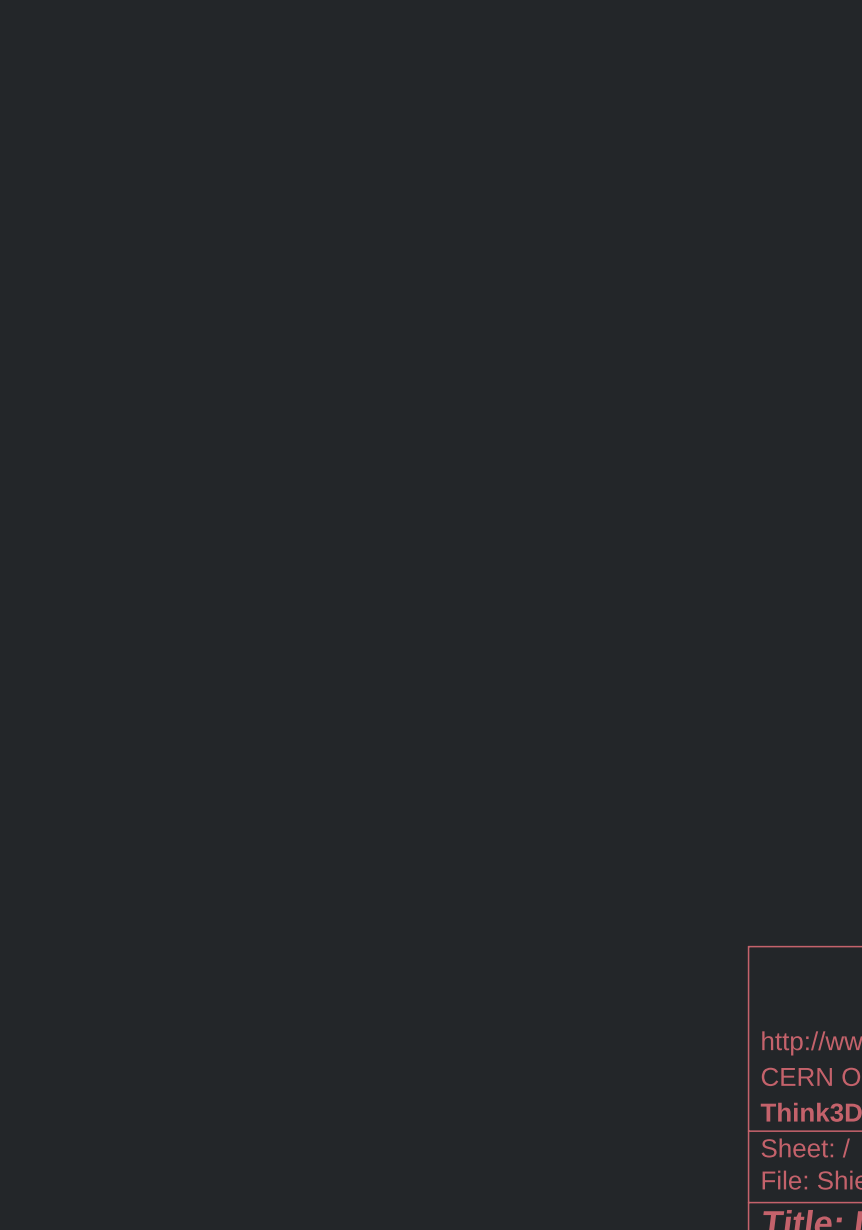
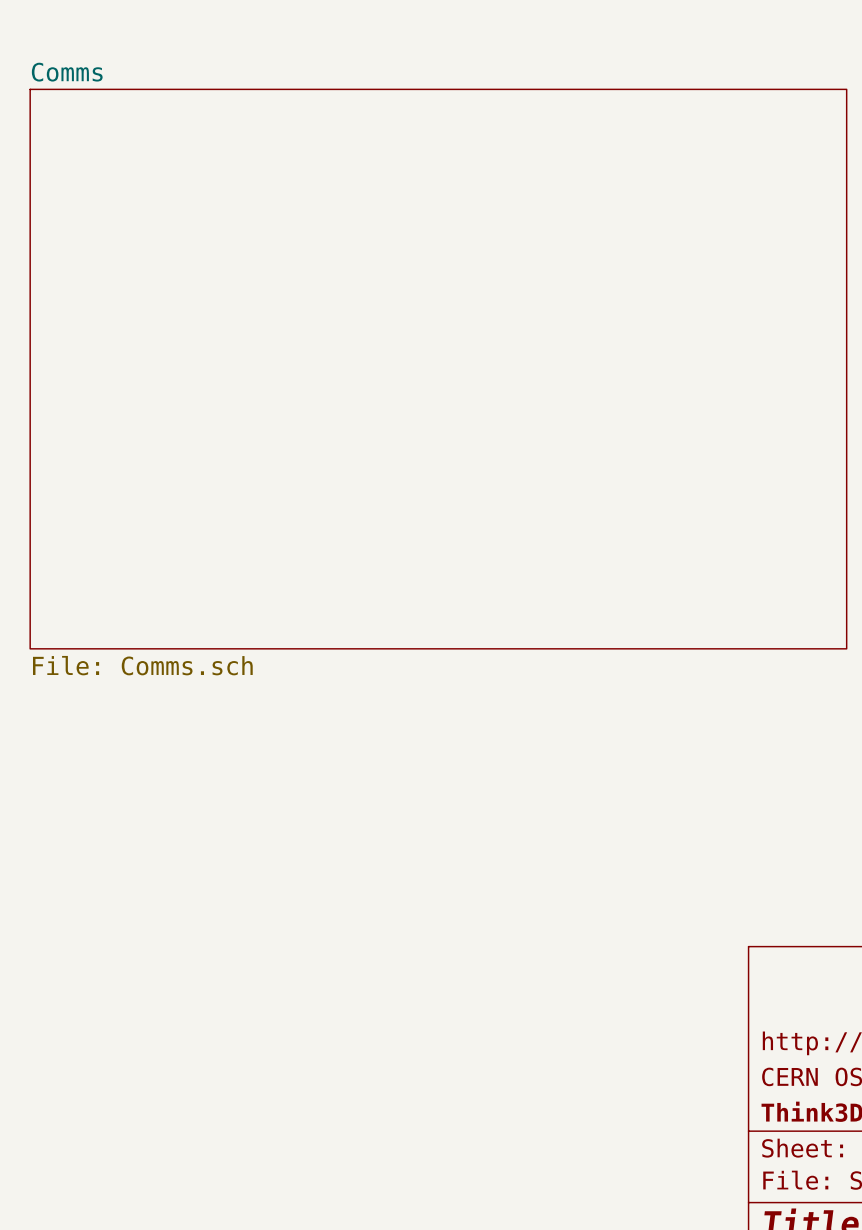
sheet Comms: none -> File: Comms.sch (438, 369)

